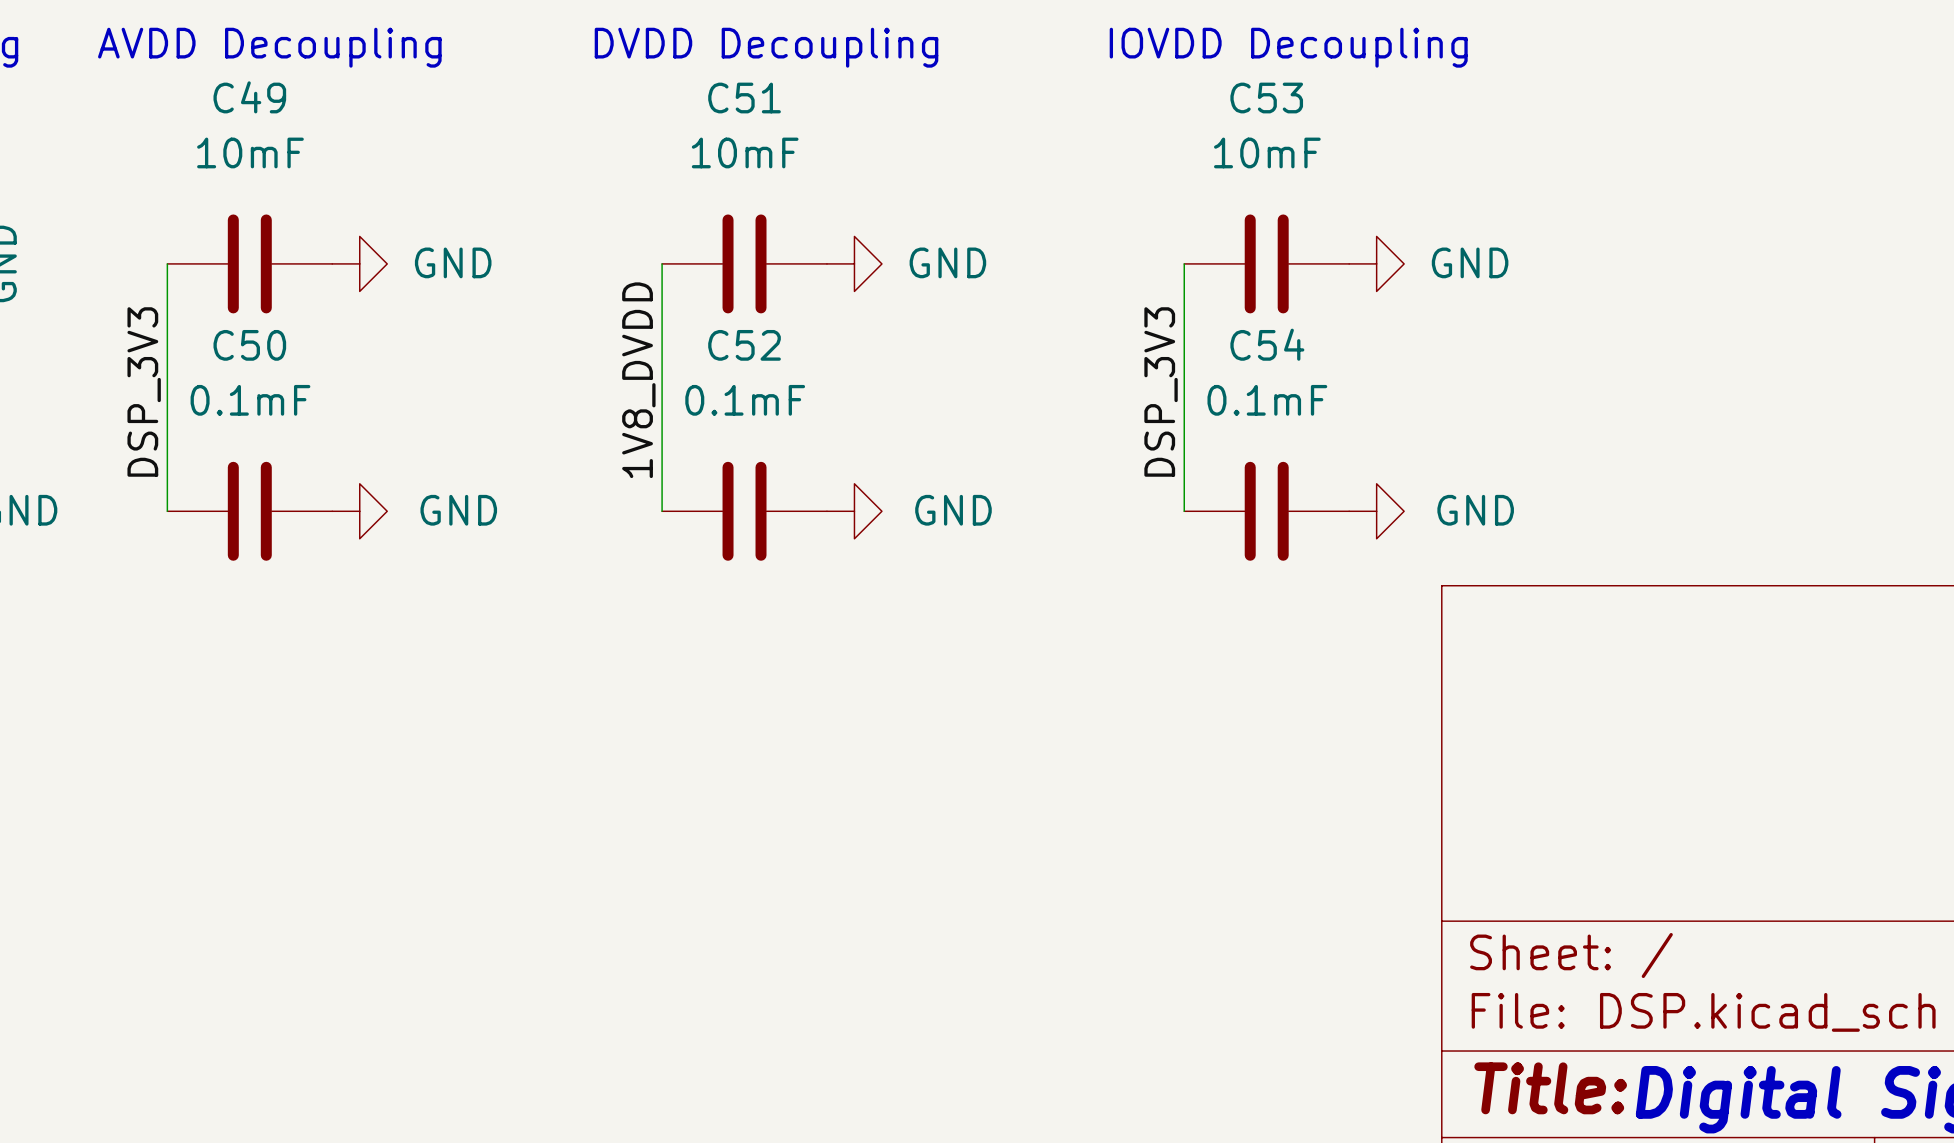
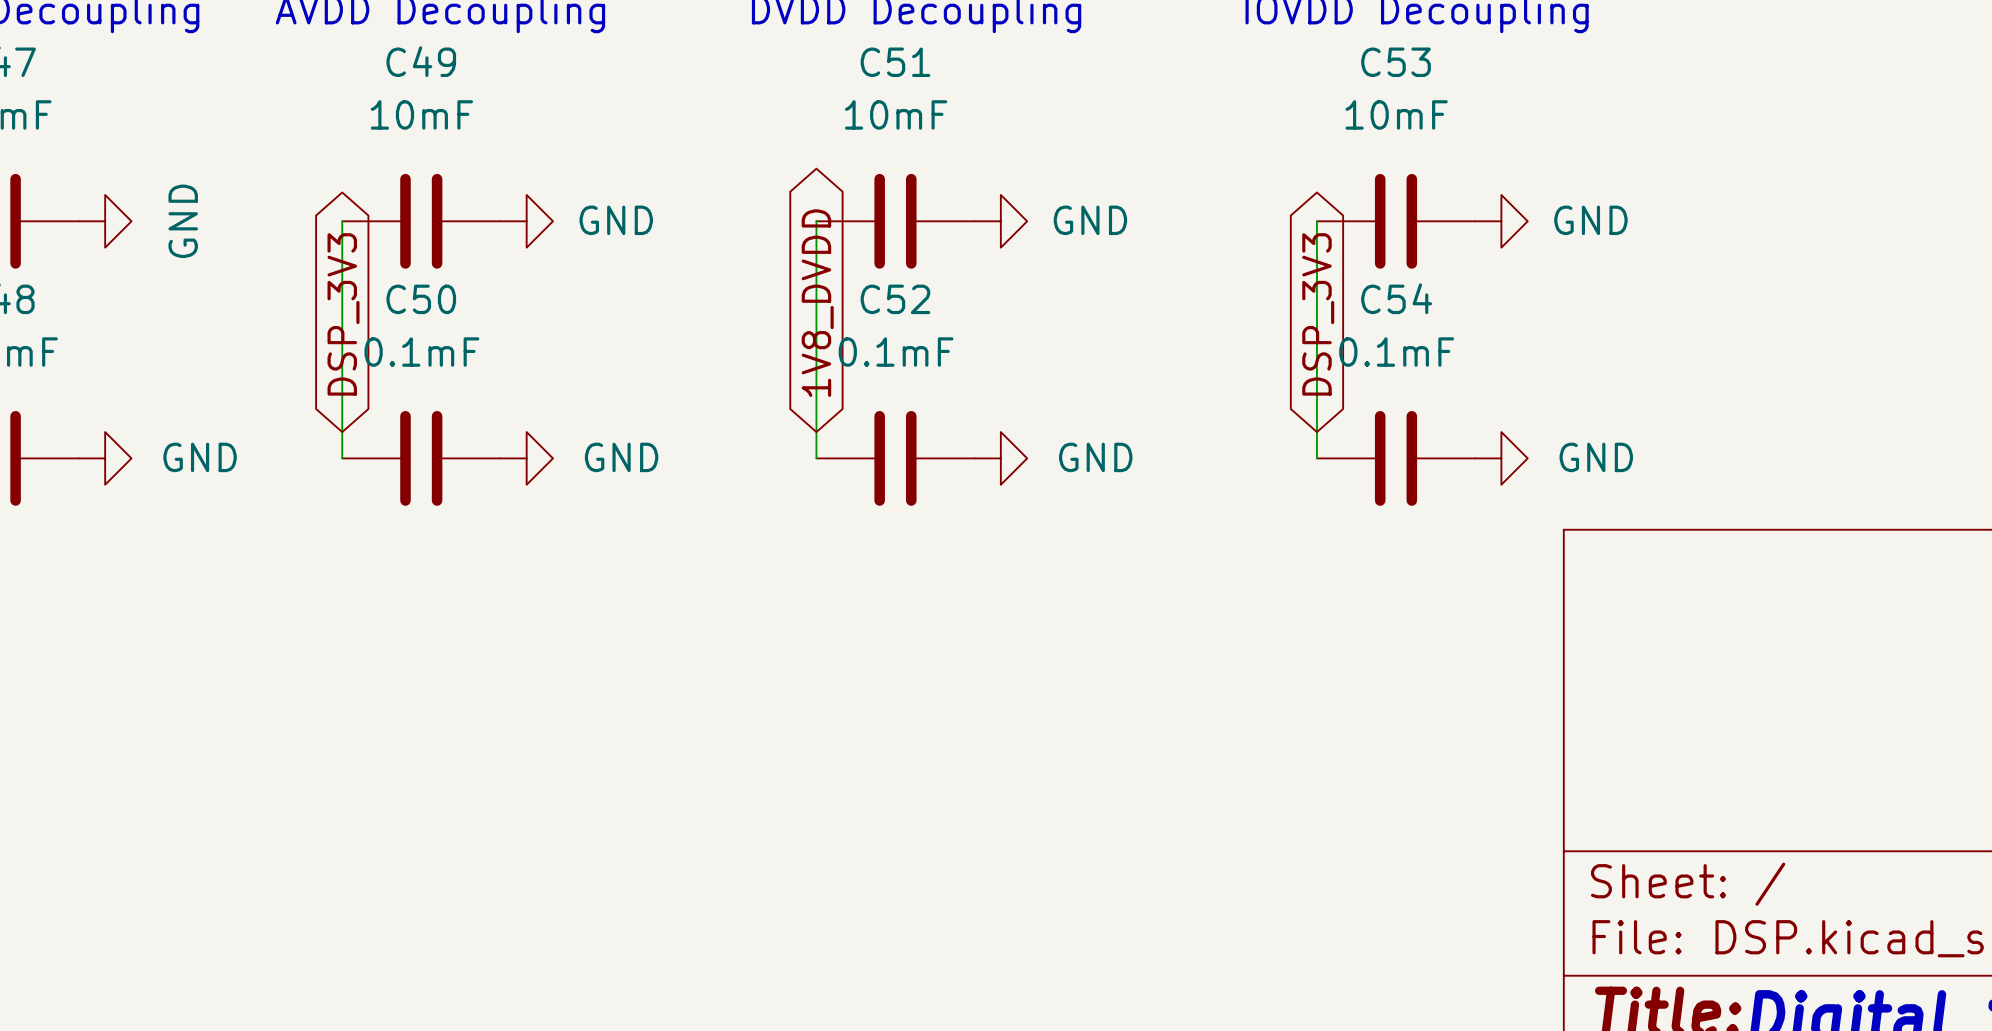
global label: none -> 1V8_DVDD (817, 303)
global label: none -> DSP_3V3 (343, 314)
global label: none -> DSP_3V3 (1318, 314)
label: 1V8_DVDD (638, 380) -> none
label: DSP_3V3 (144, 391) -> none
label: DSP_3V3 (1161, 391) -> none

